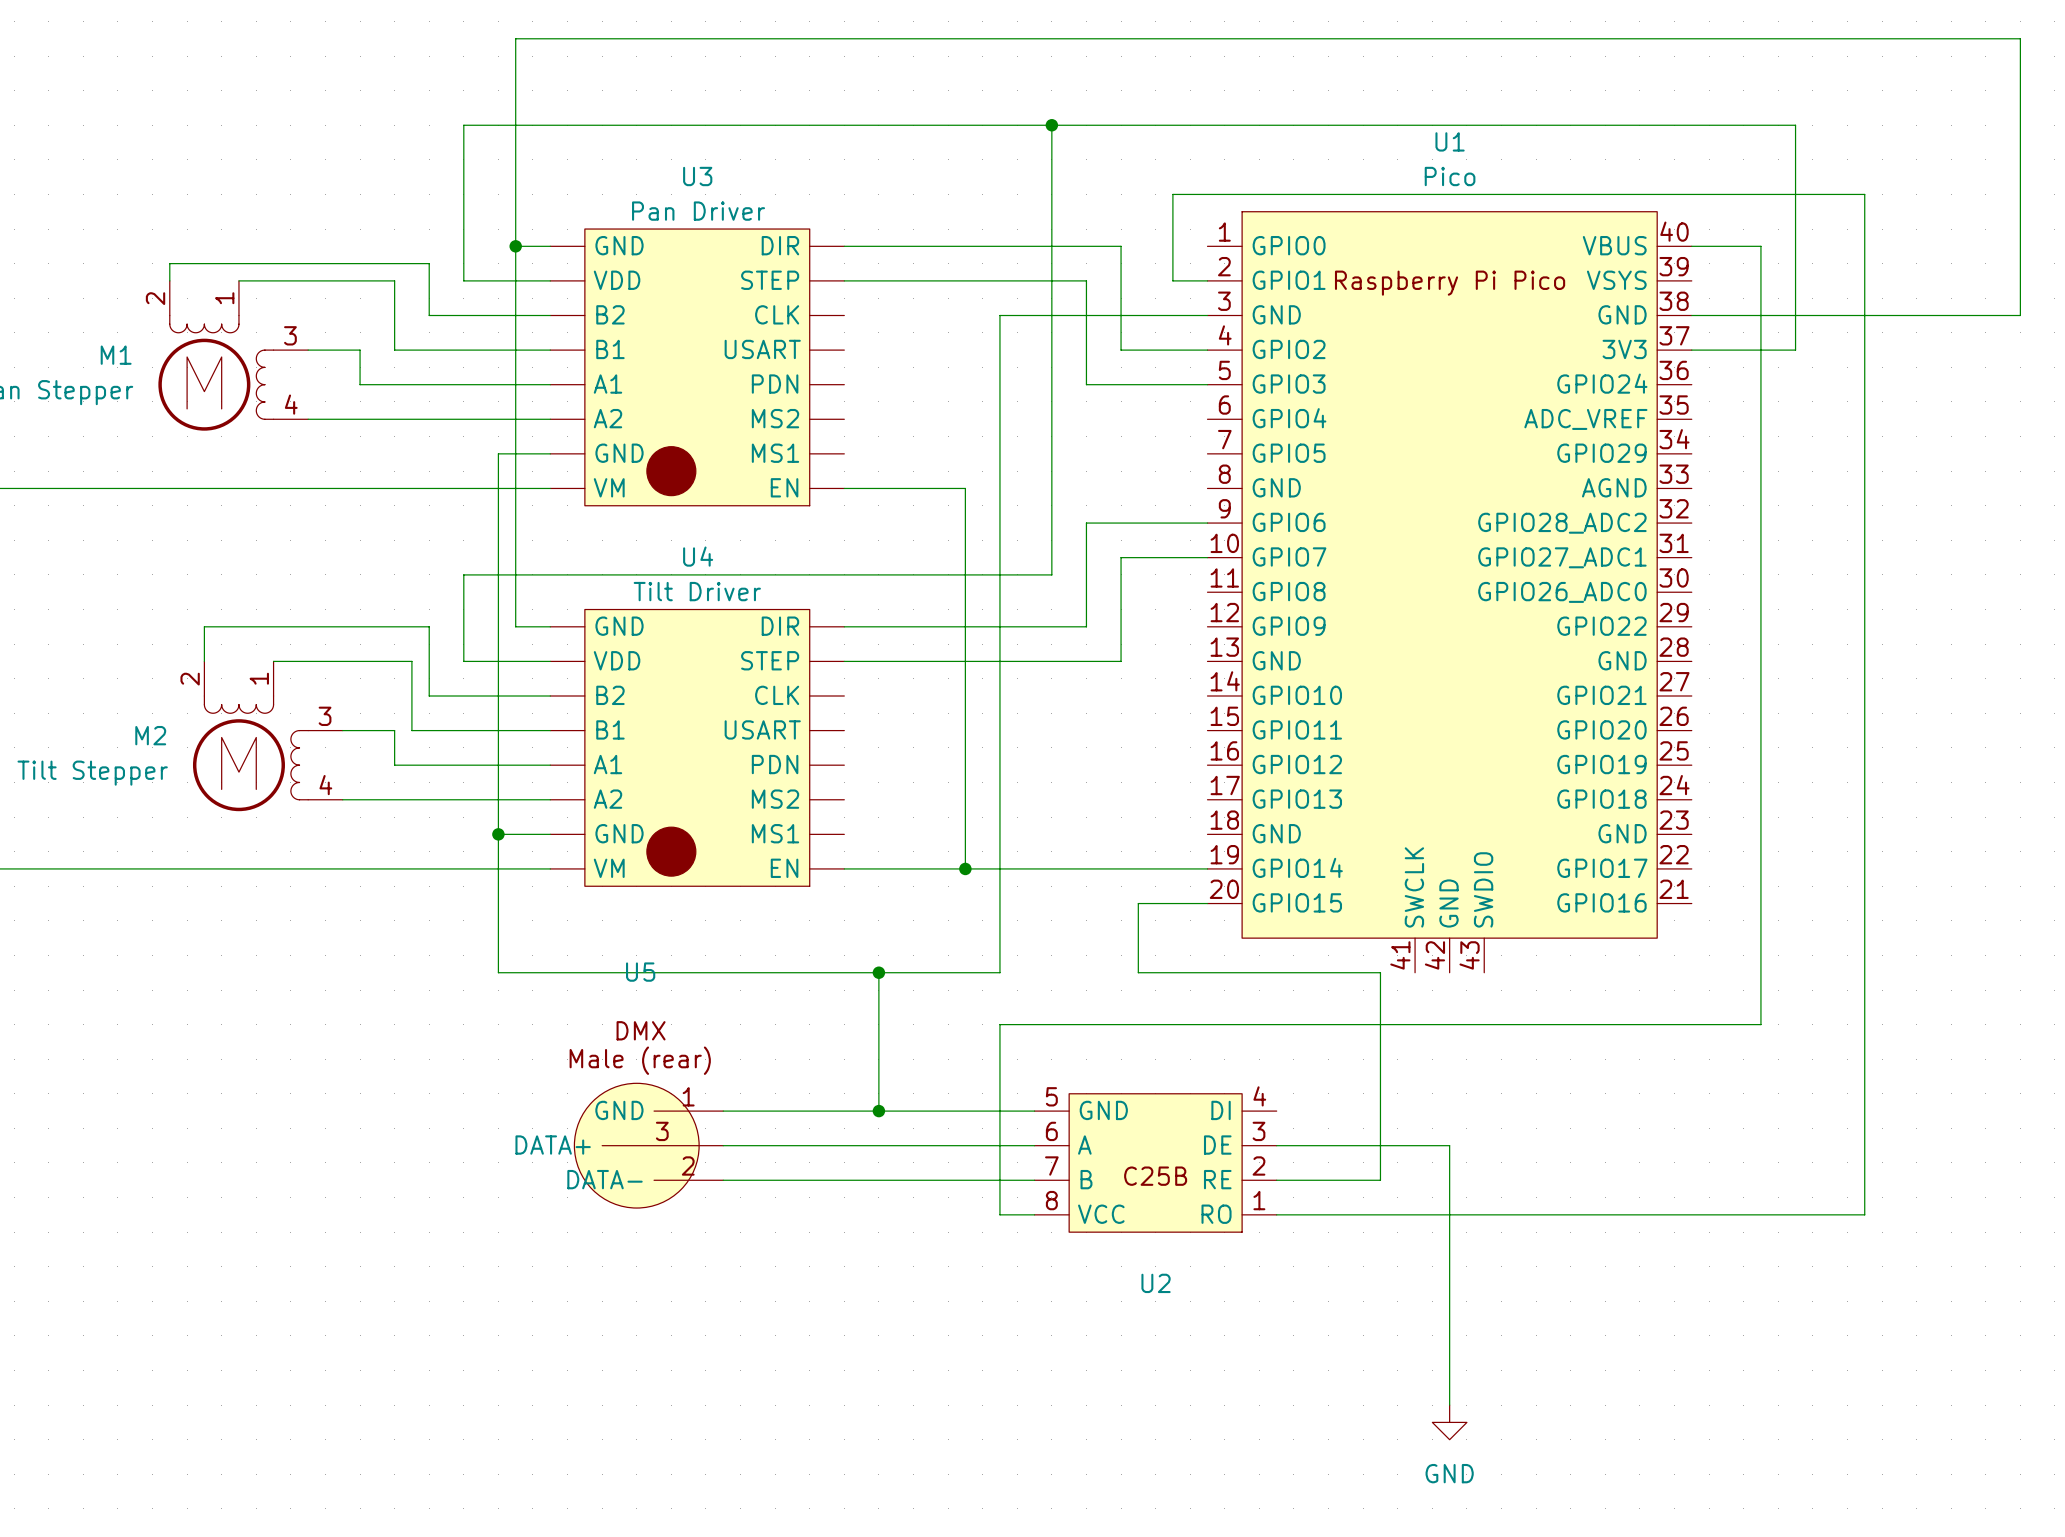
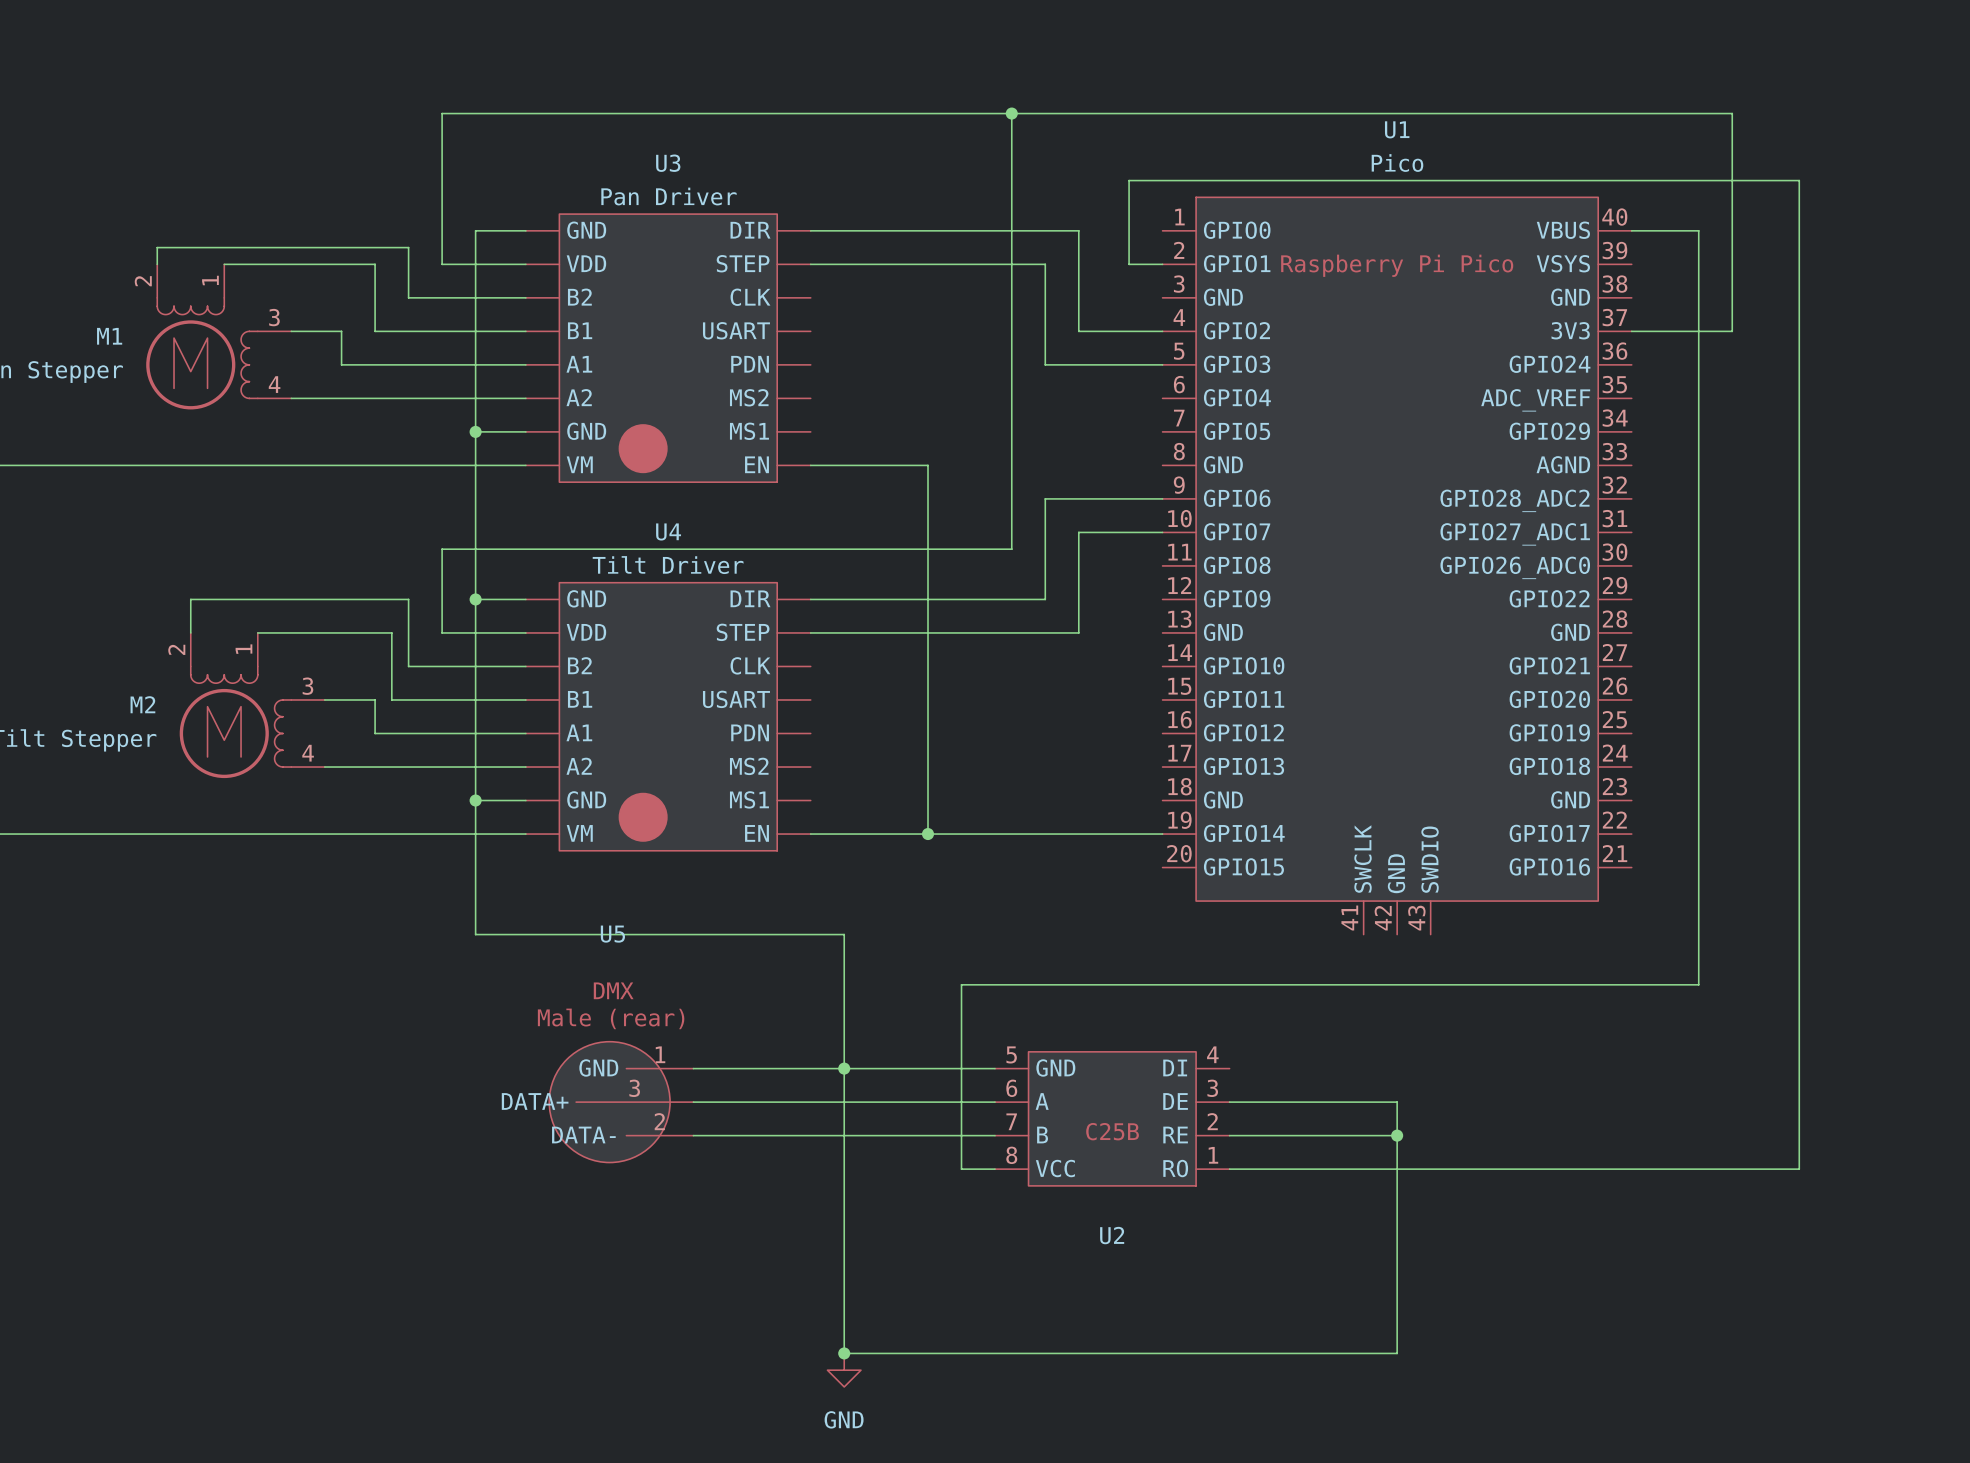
wire: none -> (492, 230) (475, 230) (475, 431)
junction: (515, 246) -> none
wire: (1207, 315) (999, 315) (999, 972) (878, 972) -> none
wire: (1691, 315) (2020, 315) (2020, 38) (515, 38) (515, 626) -> (475, 599) (492, 599)
junction: none -> (475, 431)
junction: none -> (475, 599)
wire: (1207, 903) (1138, 903) (1138, 972) (1380, 972) (1380, 1180) -> (1397, 1135) (1330, 1135)
junction: (878, 972) -> none
wire: none -> (844, 1068) (844, 1353) (1397, 1353)
junction: none -> (1397, 1135)
junction: none -> (844, 1353)
power symbol: none -> GND (844, 1370)
power symbol: GND (1449, 1422) -> none

